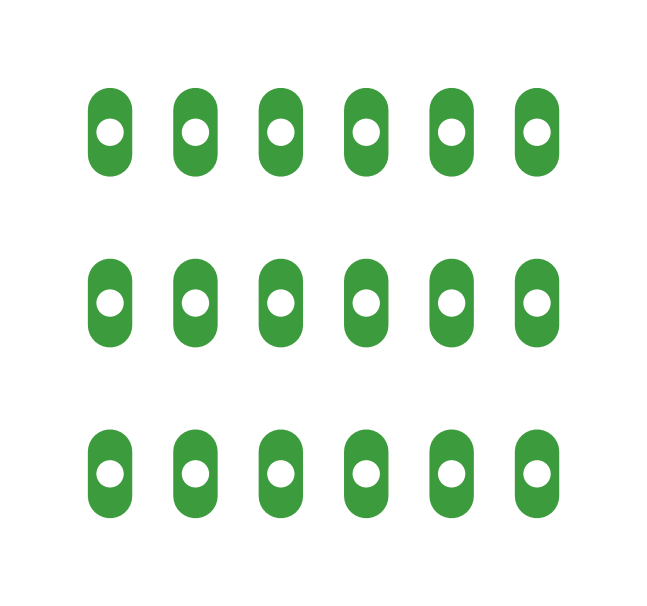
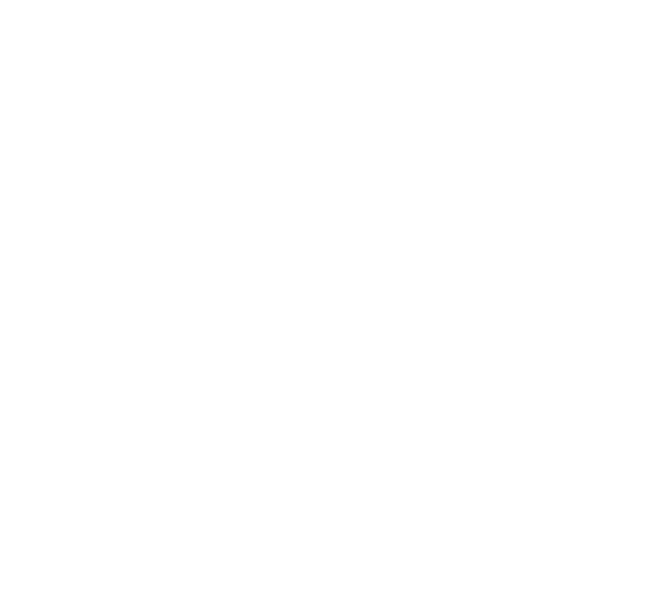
part: (323, 132) -> none
part: (323, 303) -> none
part: (323, 473) -> none

